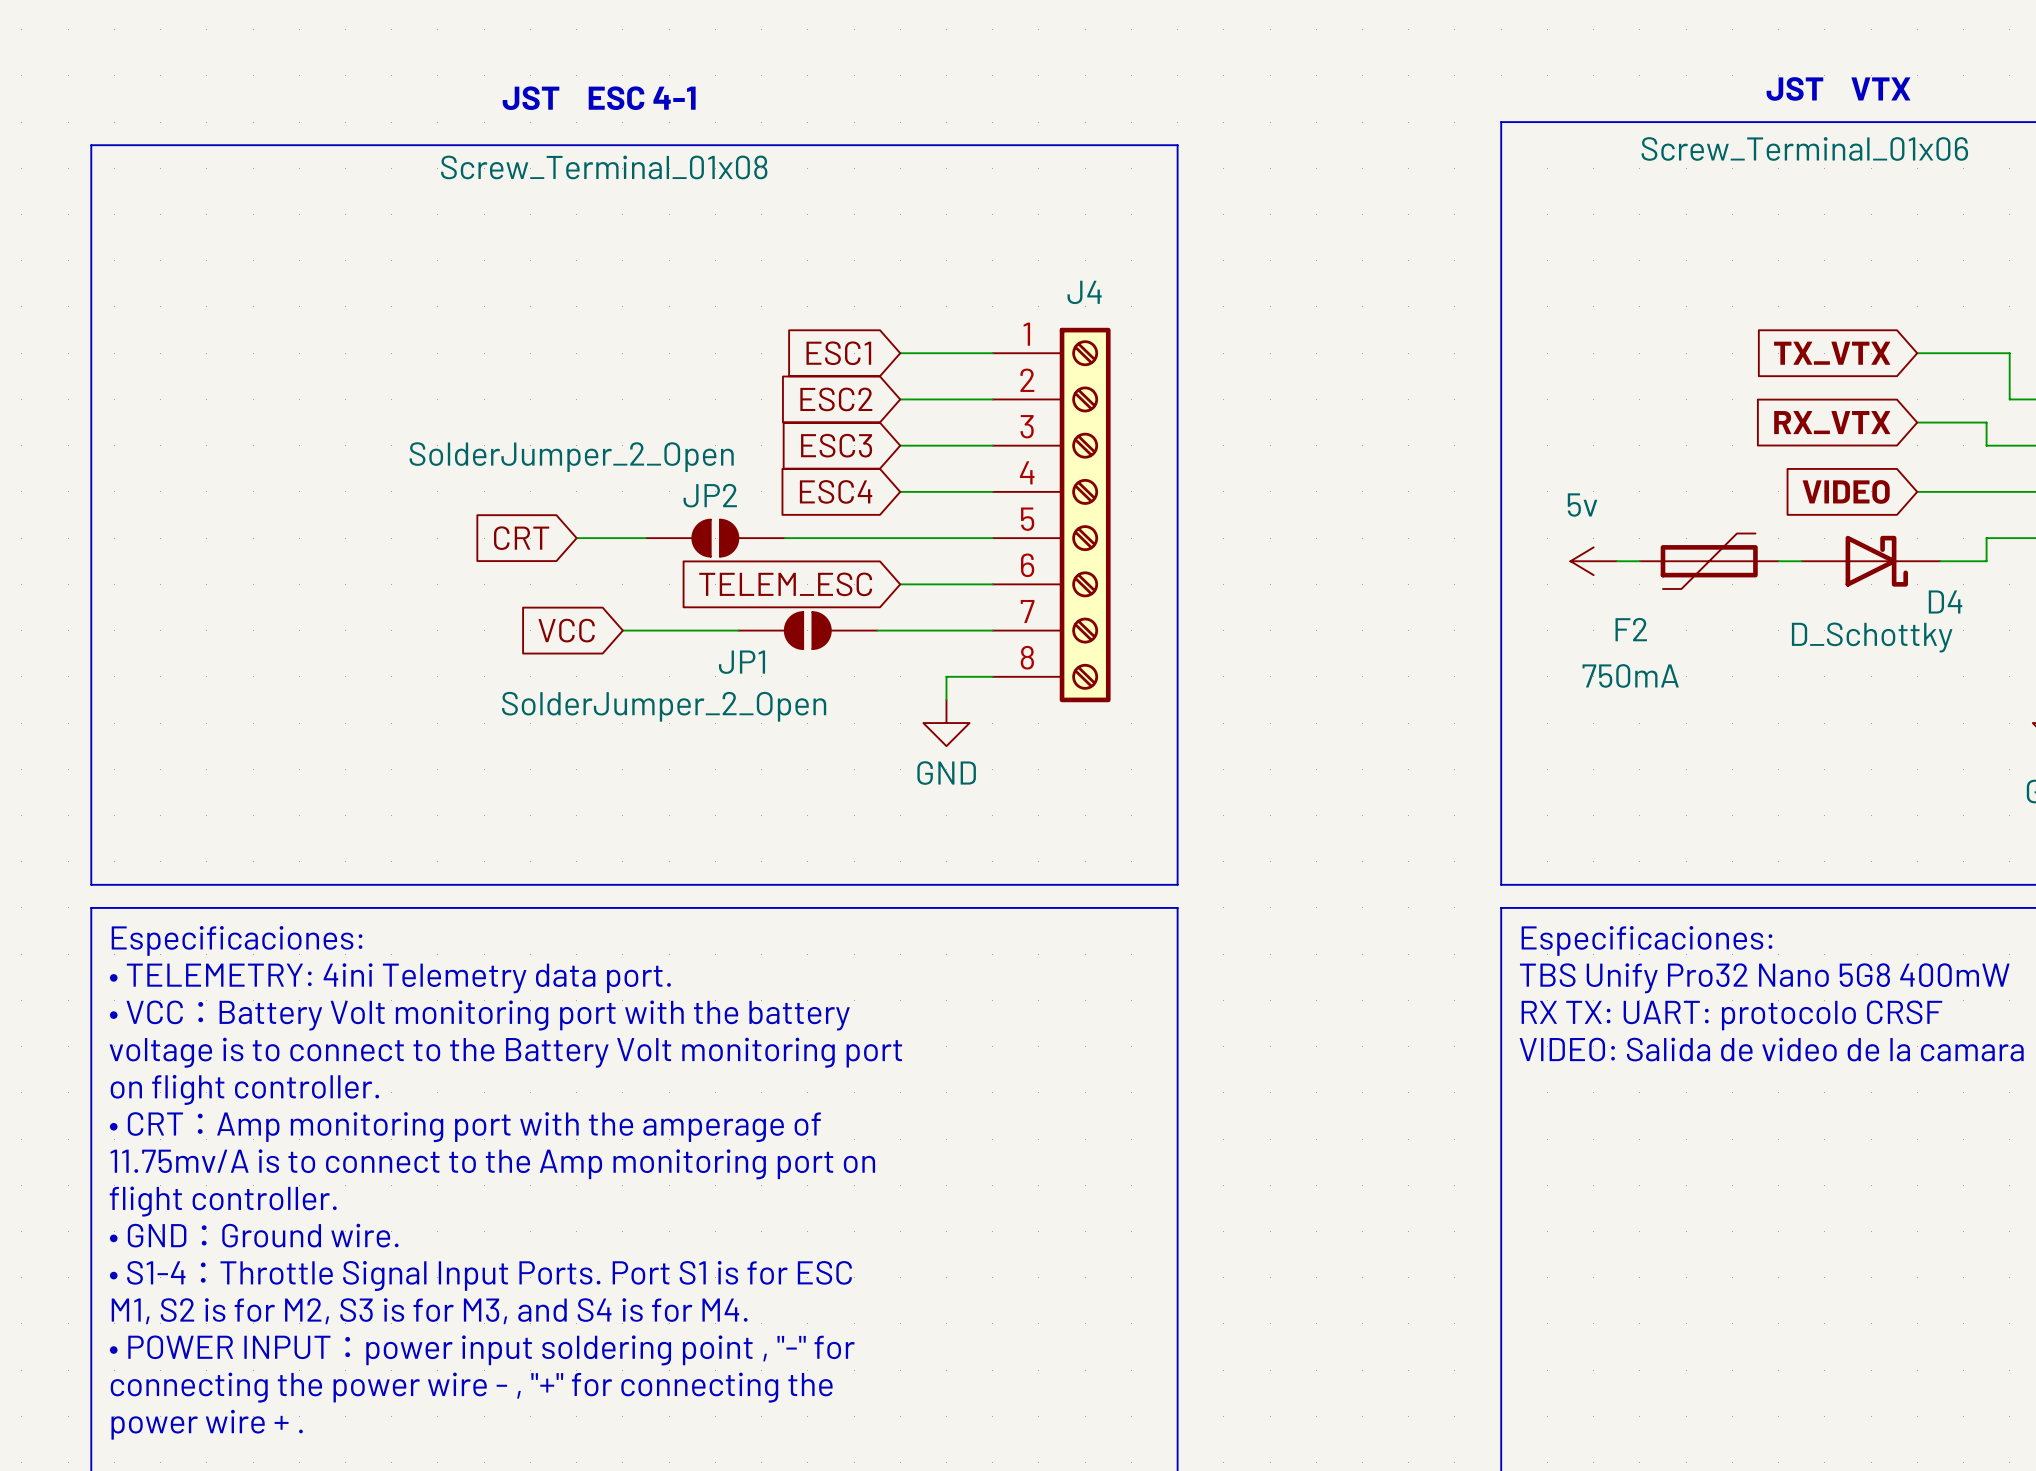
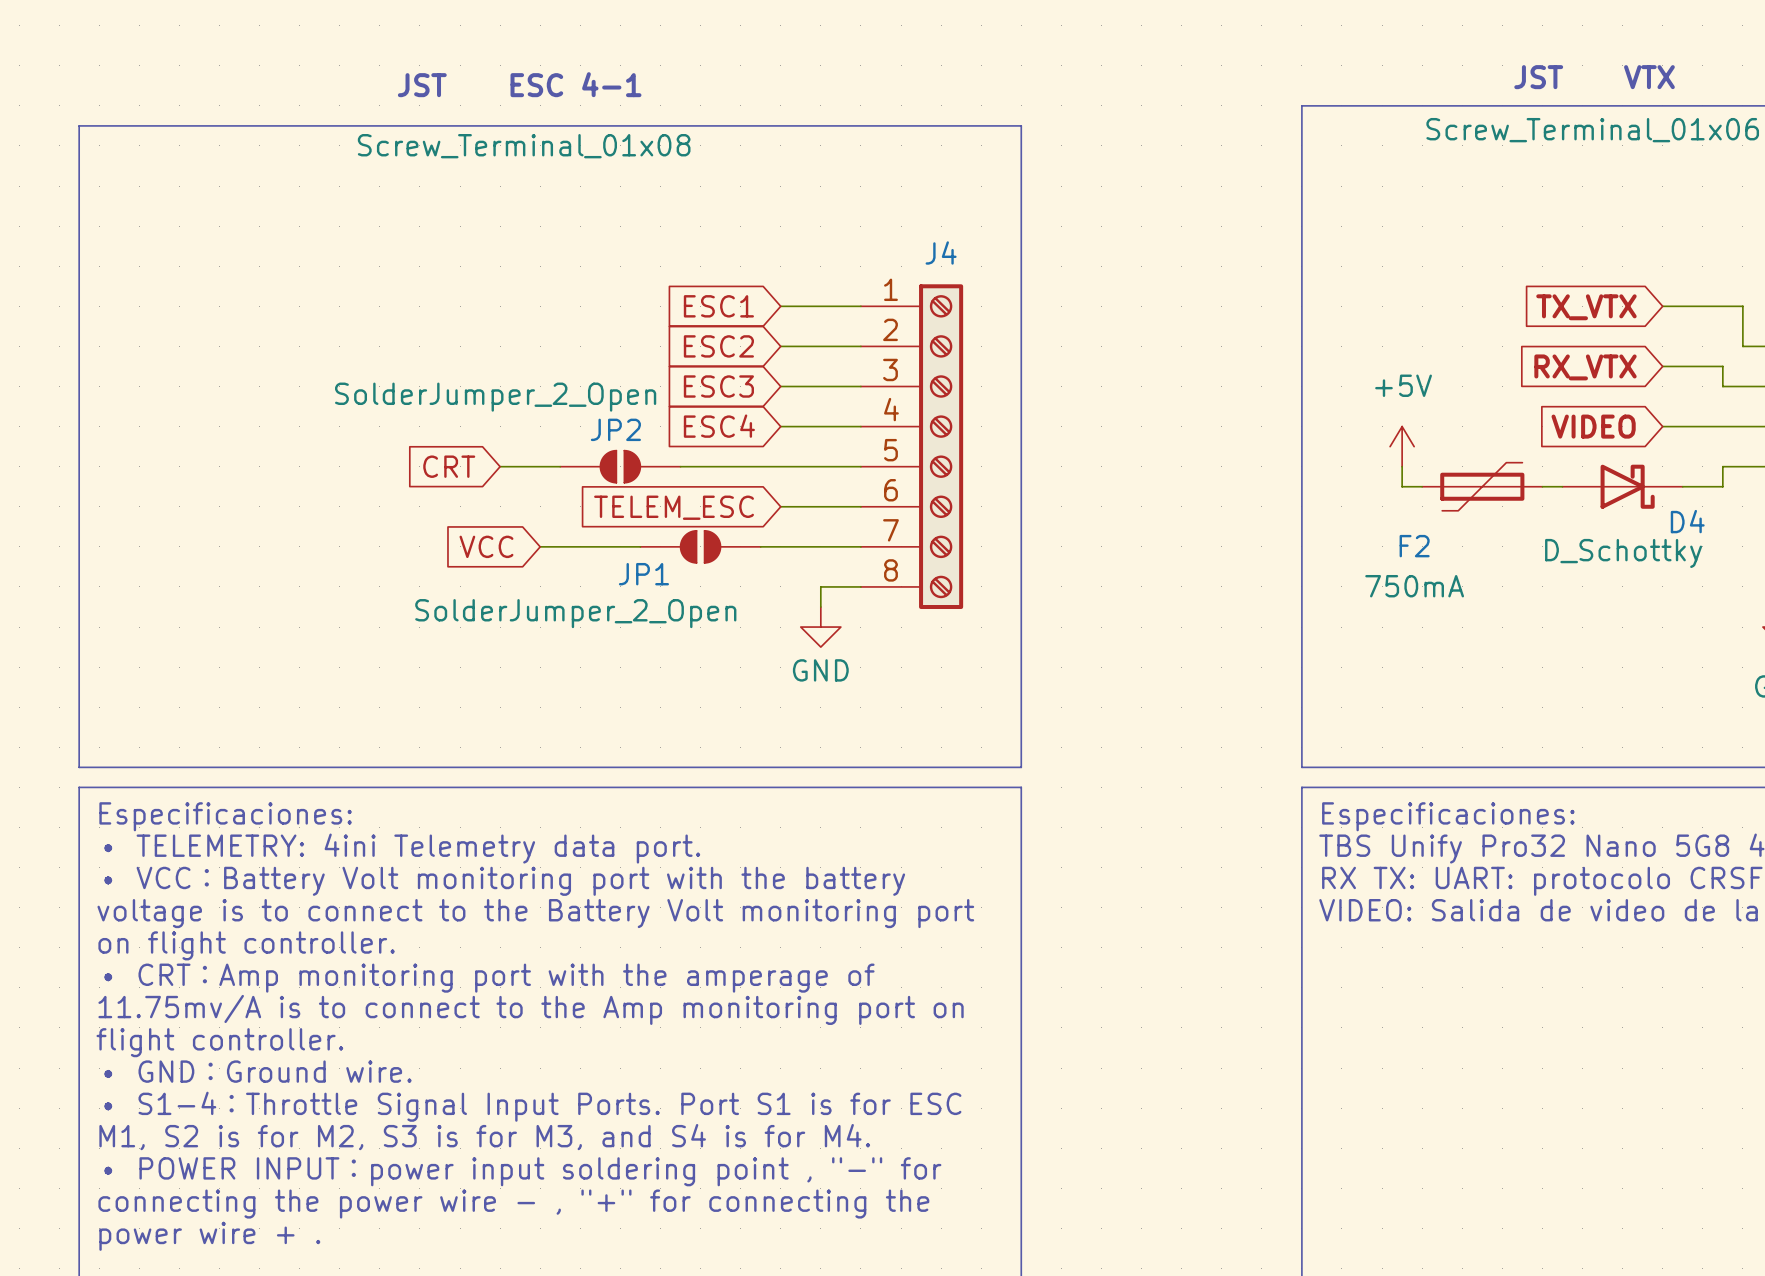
power symbol: none -> +5V (1402, 446)
wire: none -> (1402, 466) (1402, 486)
power symbol: 5v (1593, 561) -> none

